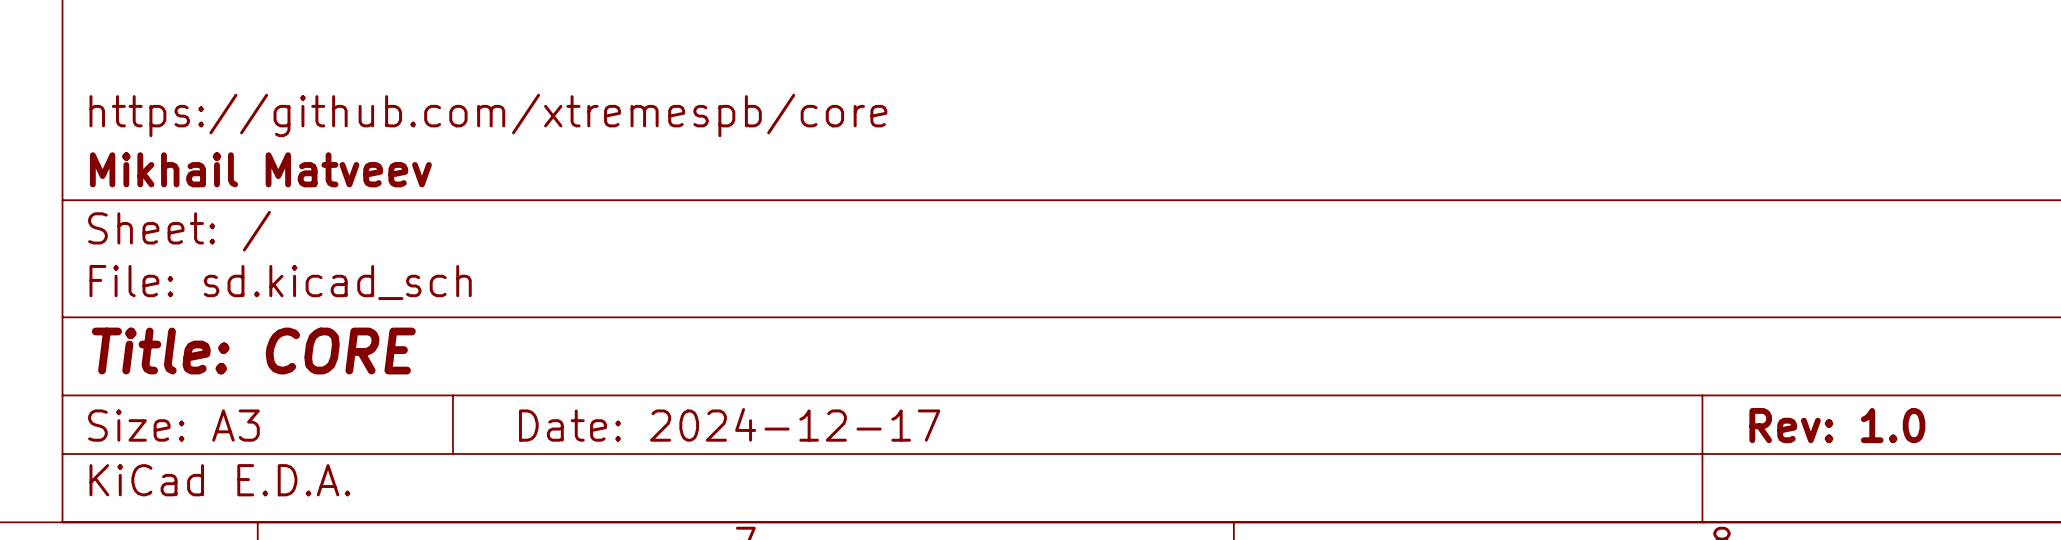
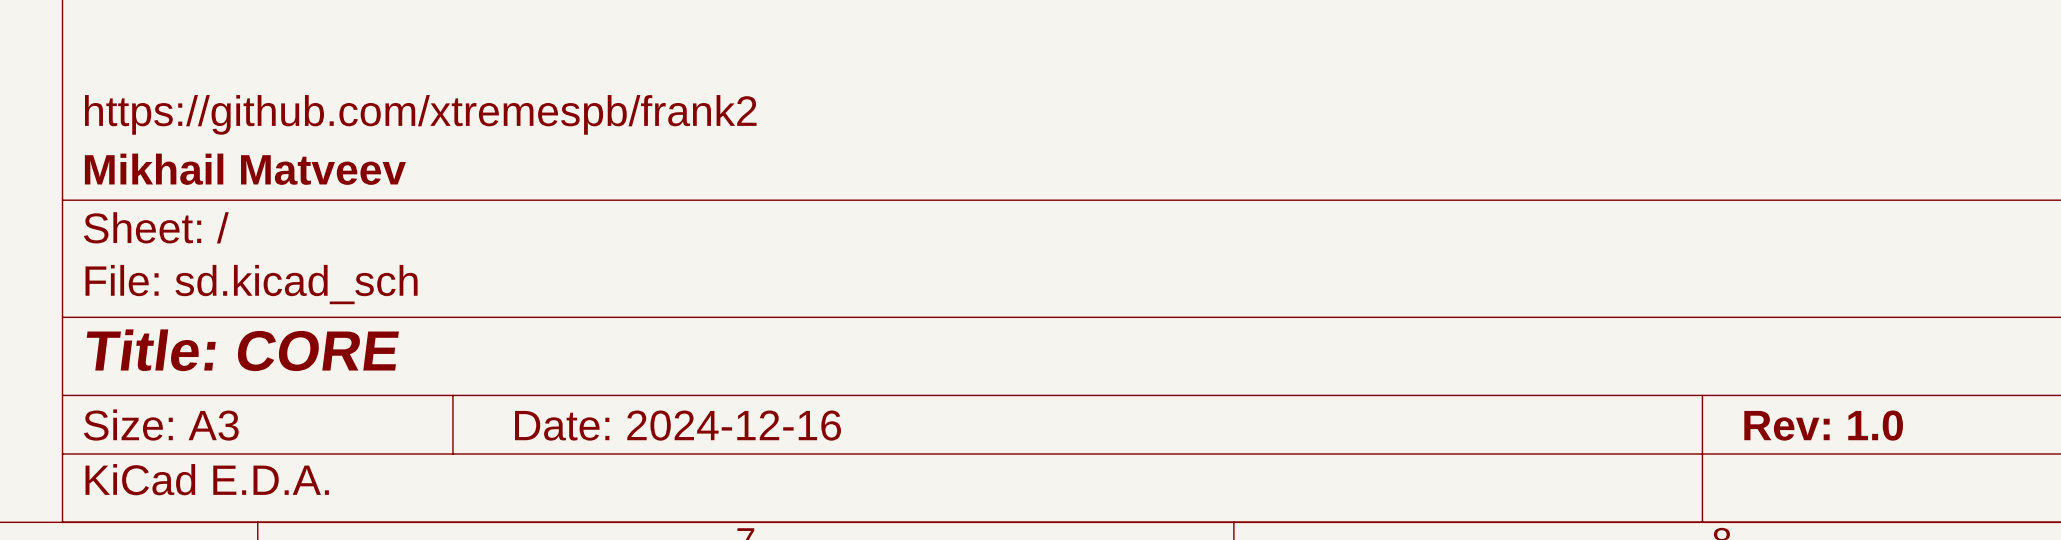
title block: https://github.com/xtremespb/core (488, 115) -> https://github.com/xtremespb/frank2 (420, 114)
title block: Date: 2024-12-17 (729, 424) -> Date: 2024-12-16 (678, 425)

